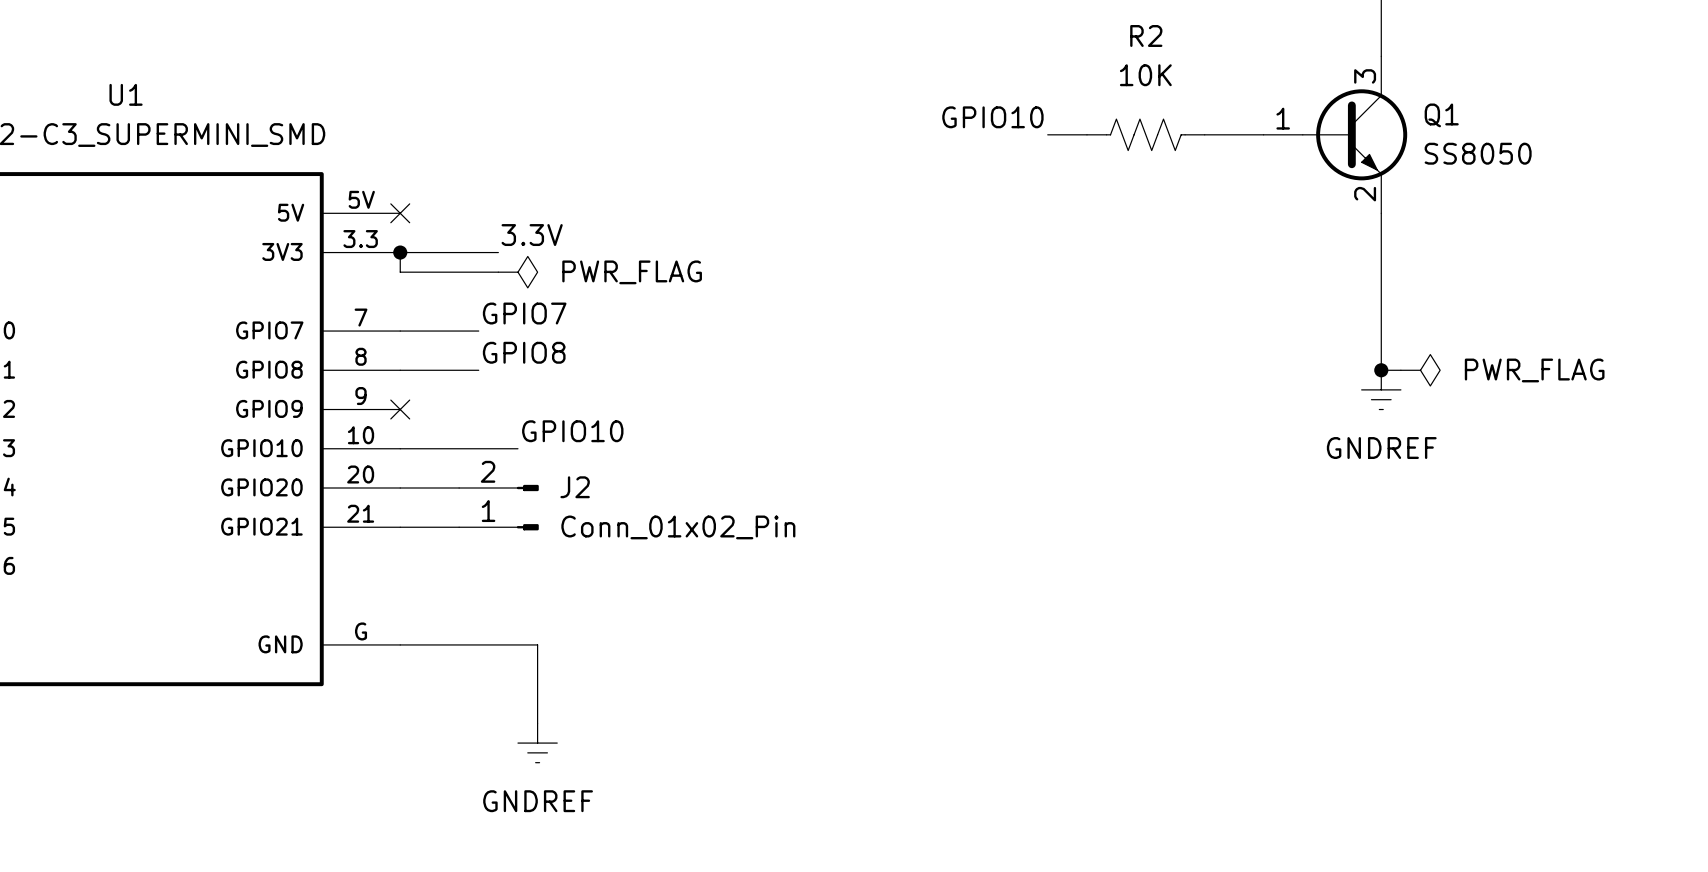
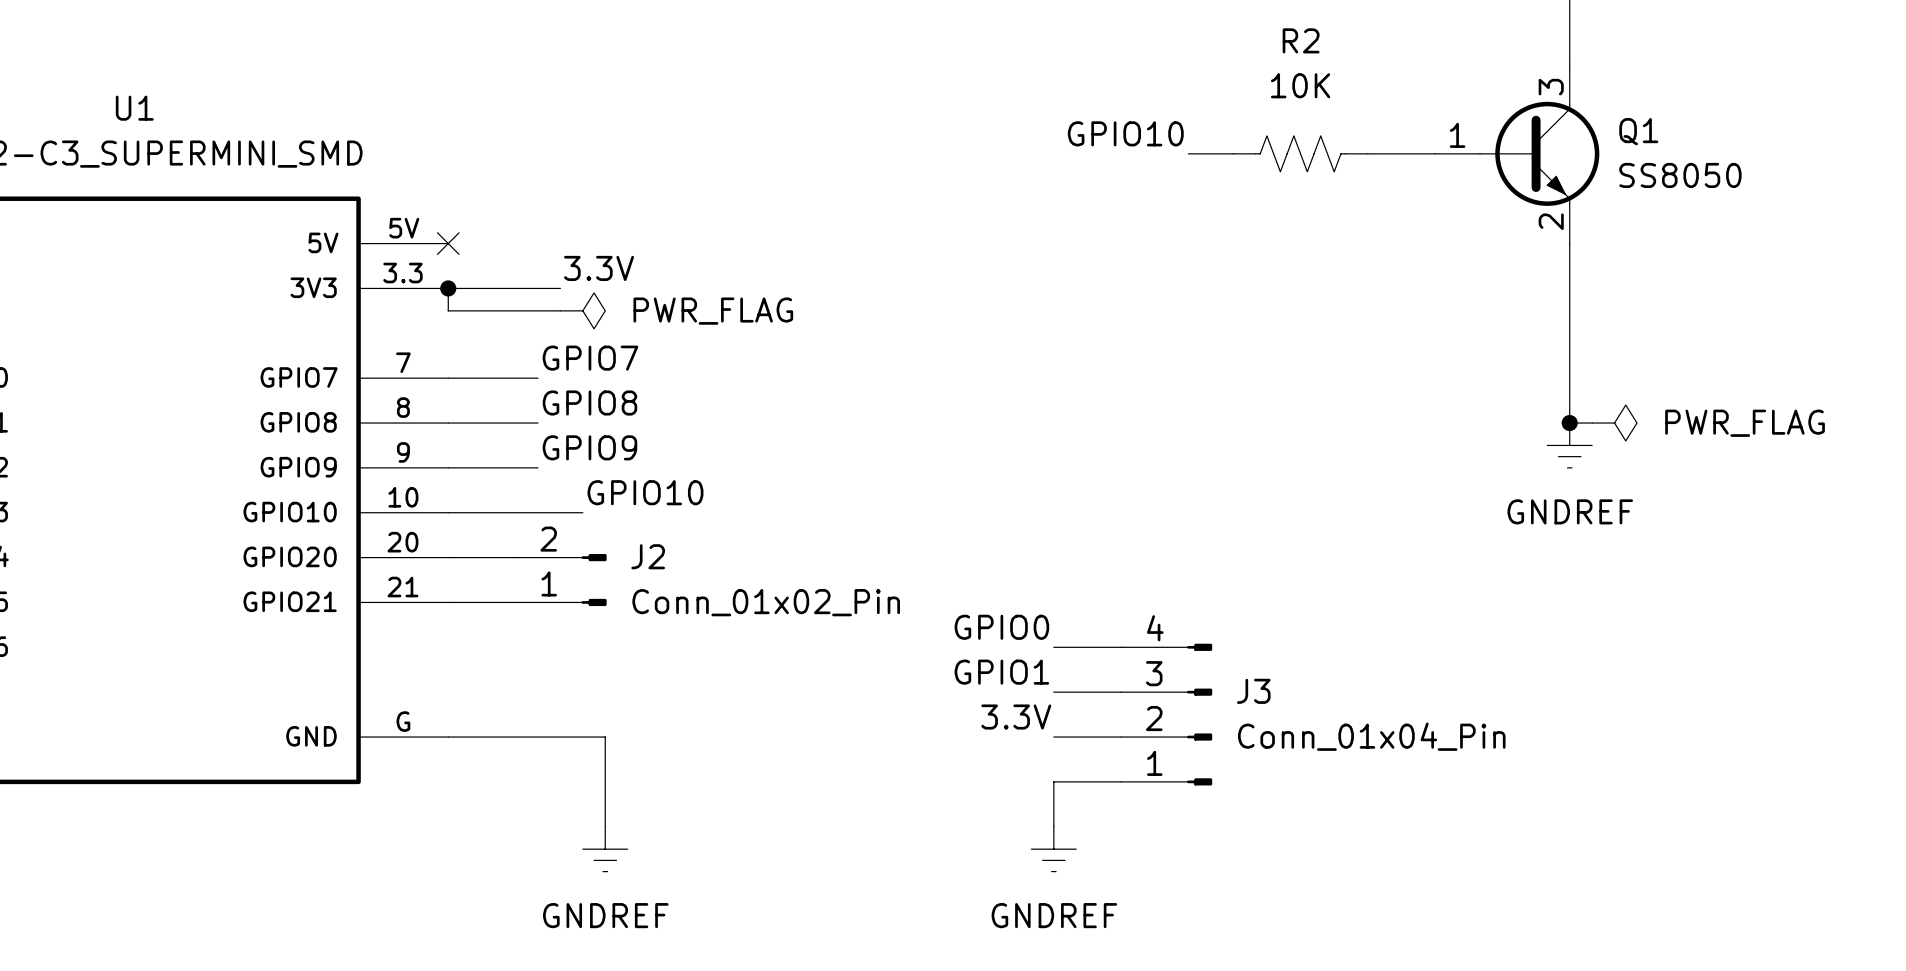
label: none -> GPIO9 (589, 447)
wire: none -> (448, 467) (537, 467)
no-connect mark: (400, 409) -> none
label: none -> GPIO0 (1001, 627)
wire: none -> (1053, 647) (1121, 647)
label: none -> GPIO1 (1001, 672)
wire: none -> (1053, 692) (1121, 692)
J3: none -> Conn_01x04_Pin (1166, 714)
label: none -> 3.3V (1016, 717)
wire: none -> (1053, 737) (1121, 737)
wire: none -> (1121, 781) (1053, 781) (1053, 826)
power symbol: none -> GNDREF (1053, 849)

